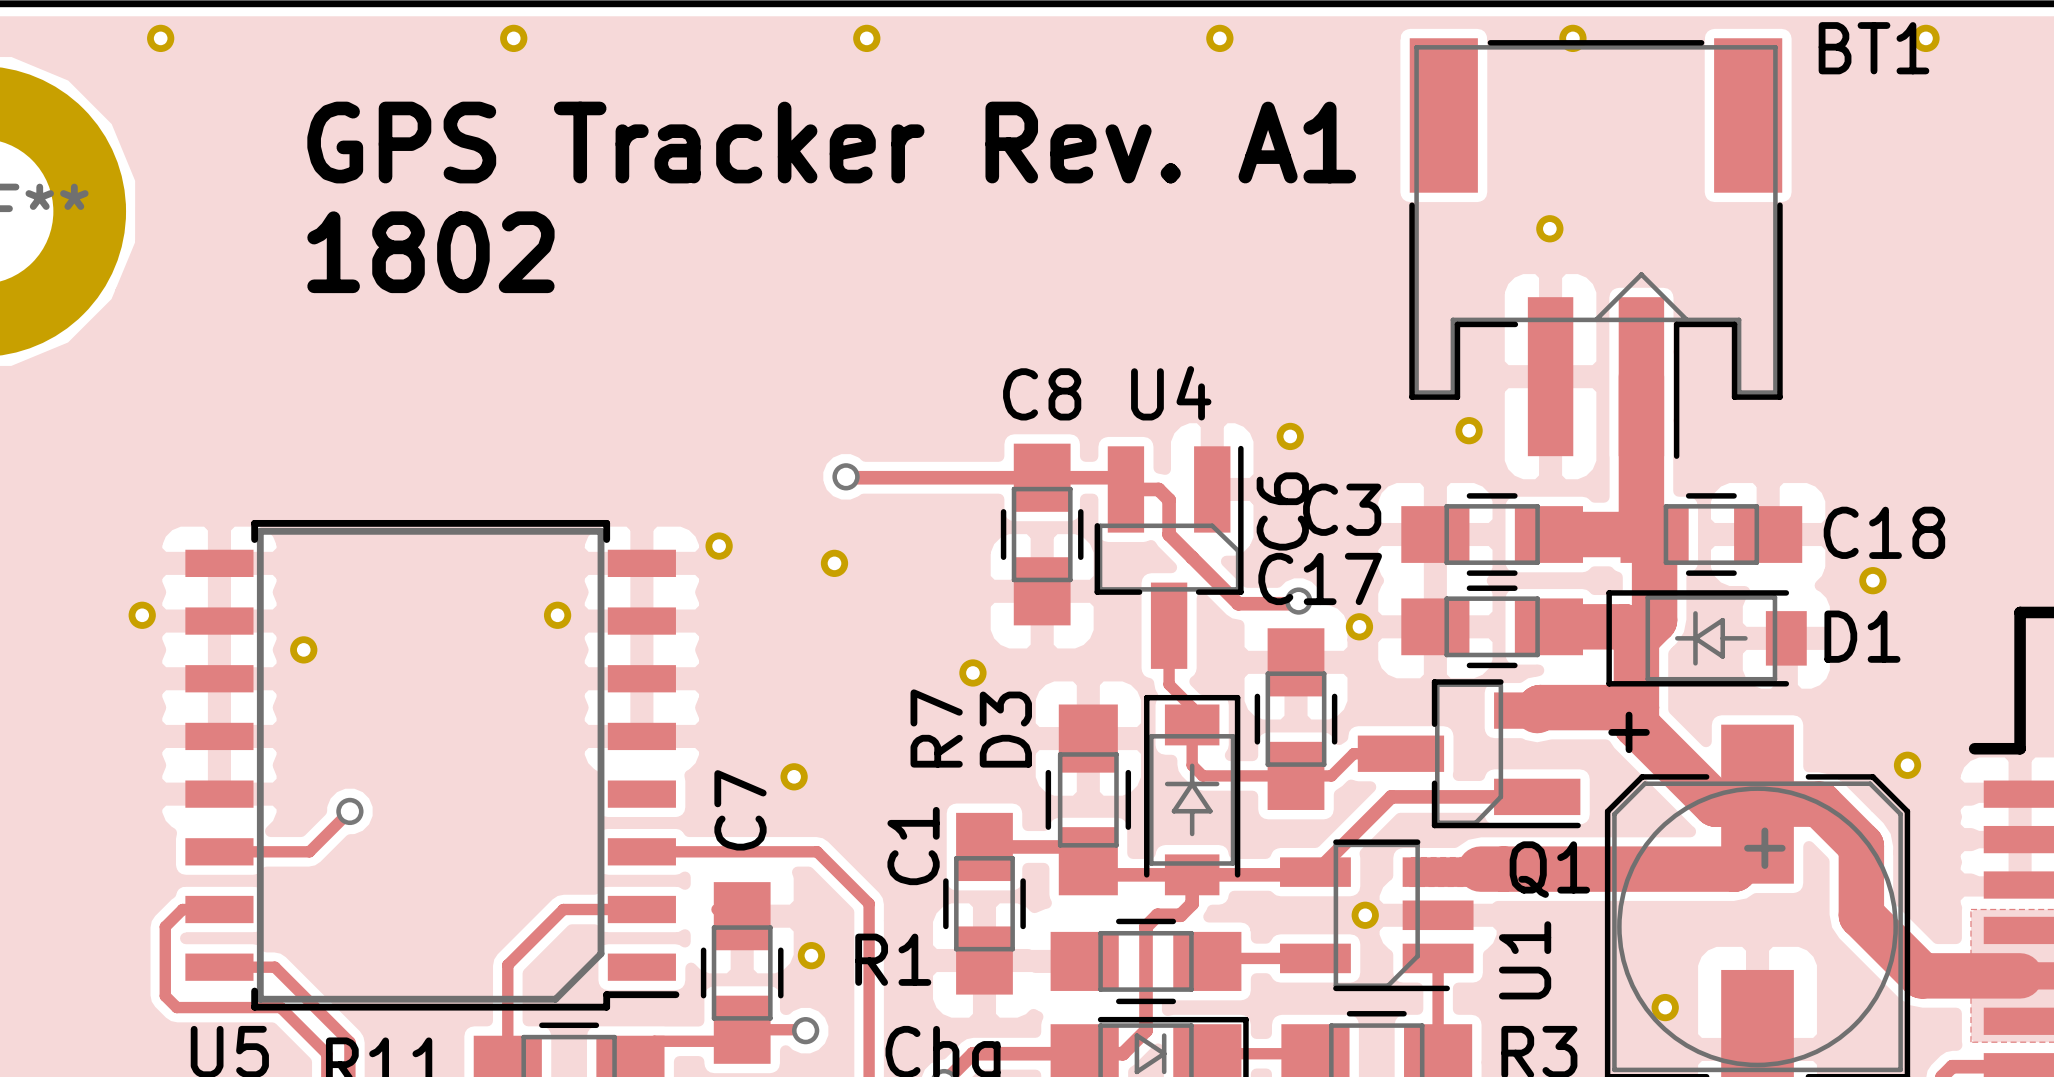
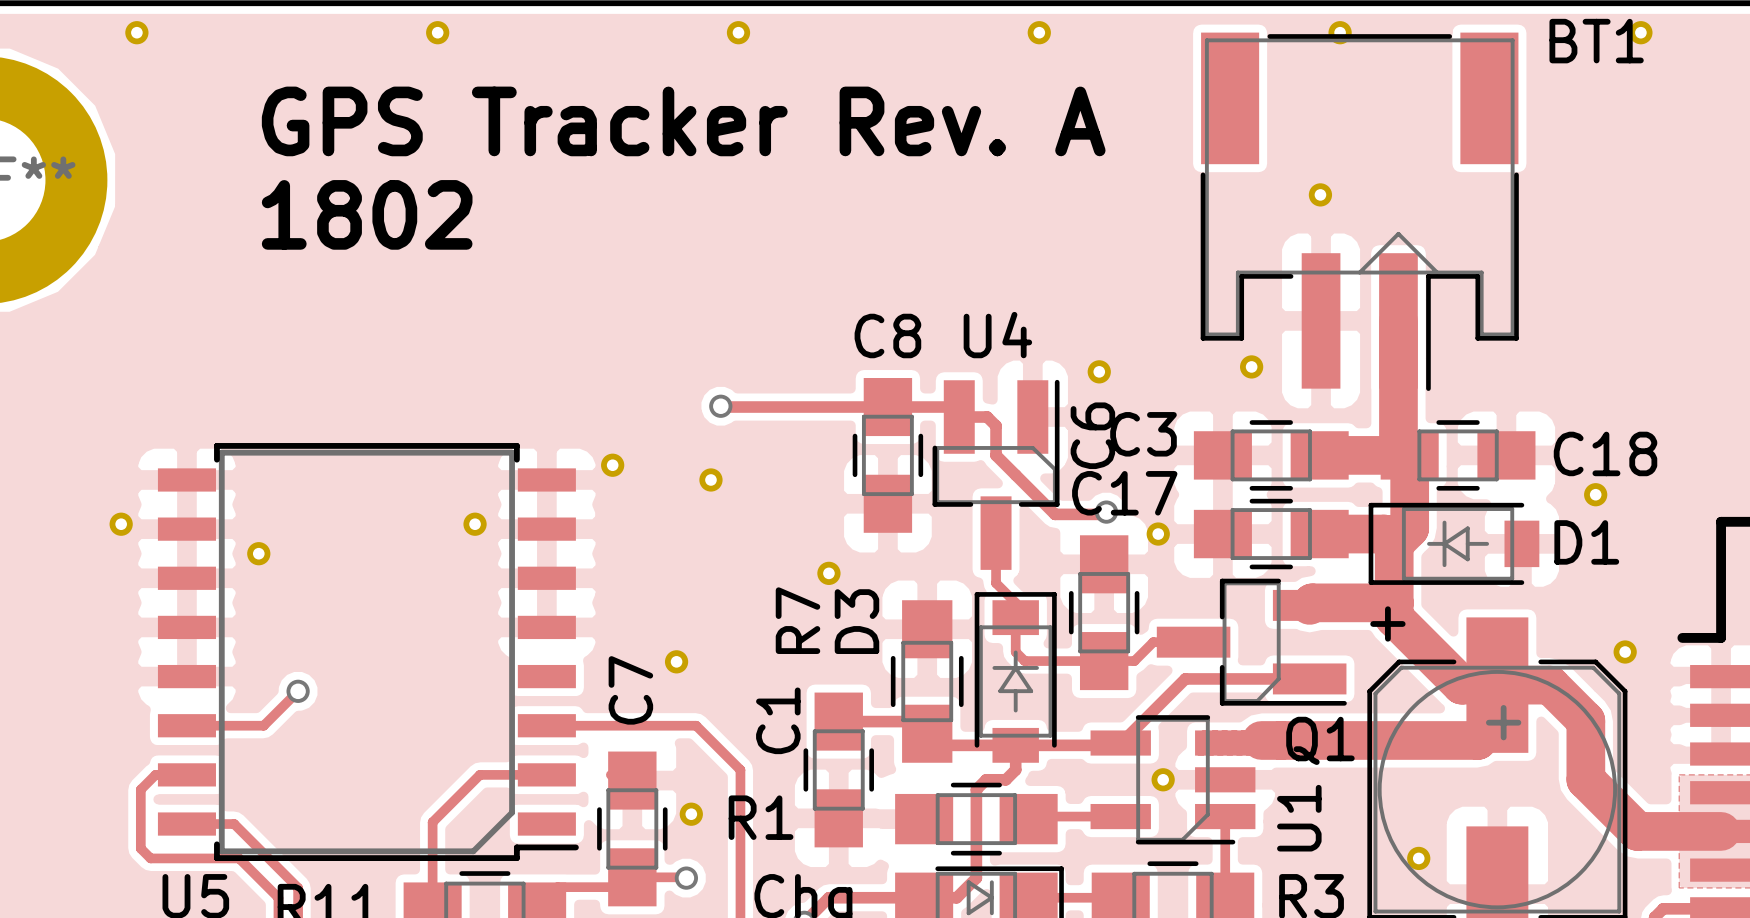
text: GPS Tracker Rev. A1 (831, 142) -> GPS Tracker Rev. A (683, 121)

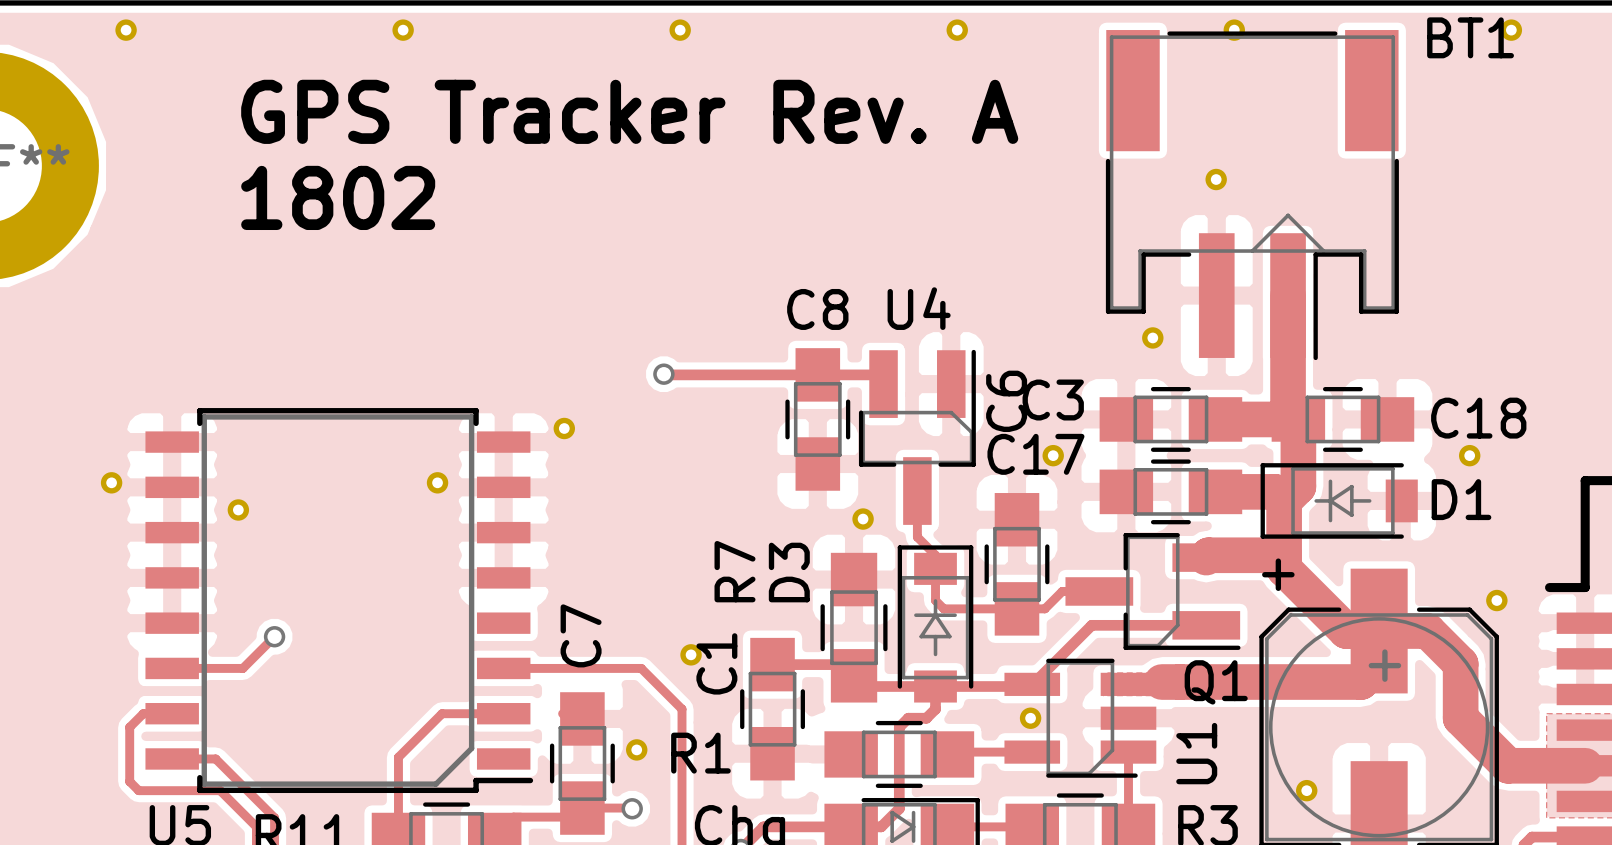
part: (1099, 371) -> none
track: (959, 417) (987, 417) (996, 425) (996, 455) (1055, 514) (1104, 514) (1106, 512) -> none
part: (710, 479) -> none
via: (1106, 512) -> none
part position: (1158, 534) -> (1053, 455)
part: none -> (863, 519)
part: (828, 573) -> none
part: (676, 661) -> none
part: none -> (691, 654)
part position: (1163, 779) -> (1030, 718)

